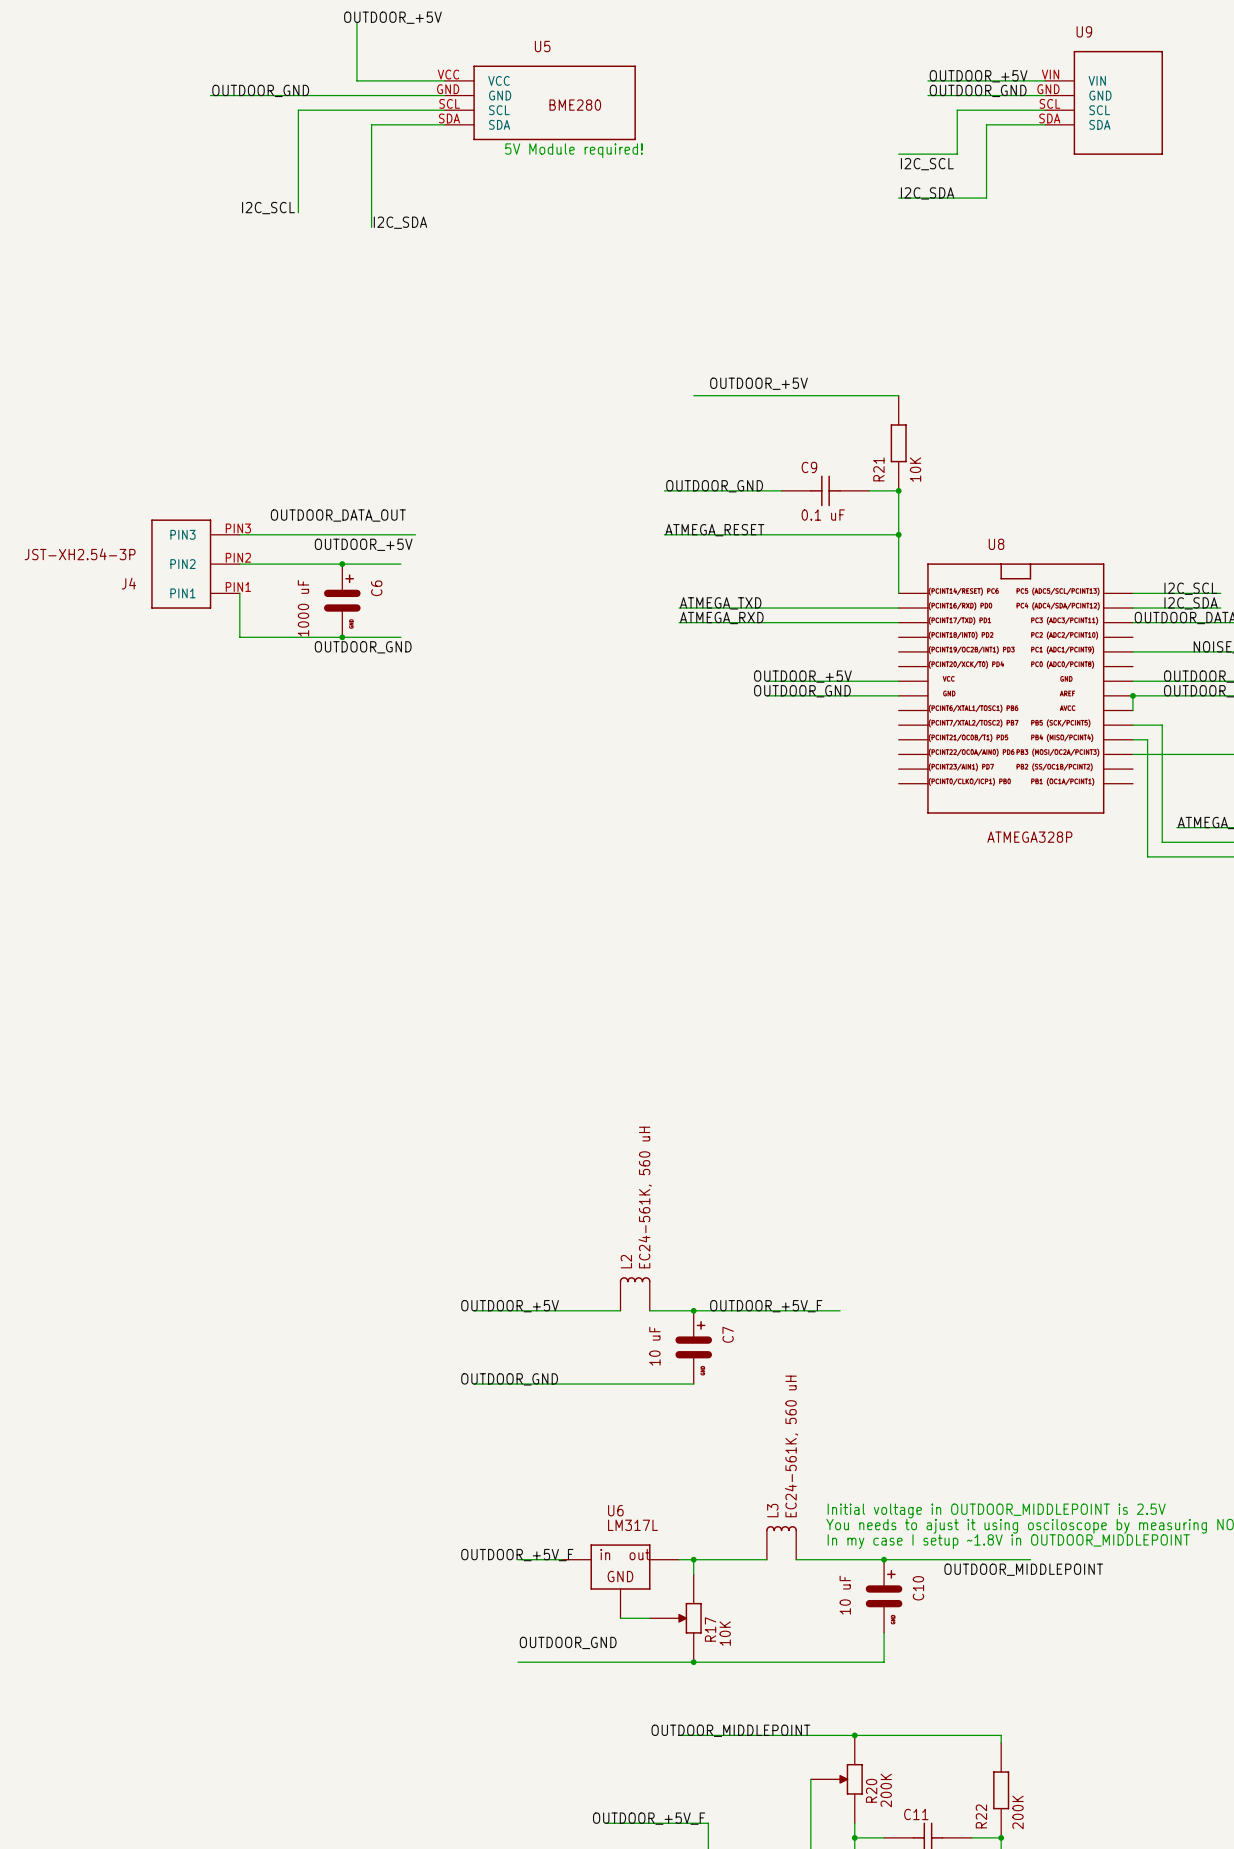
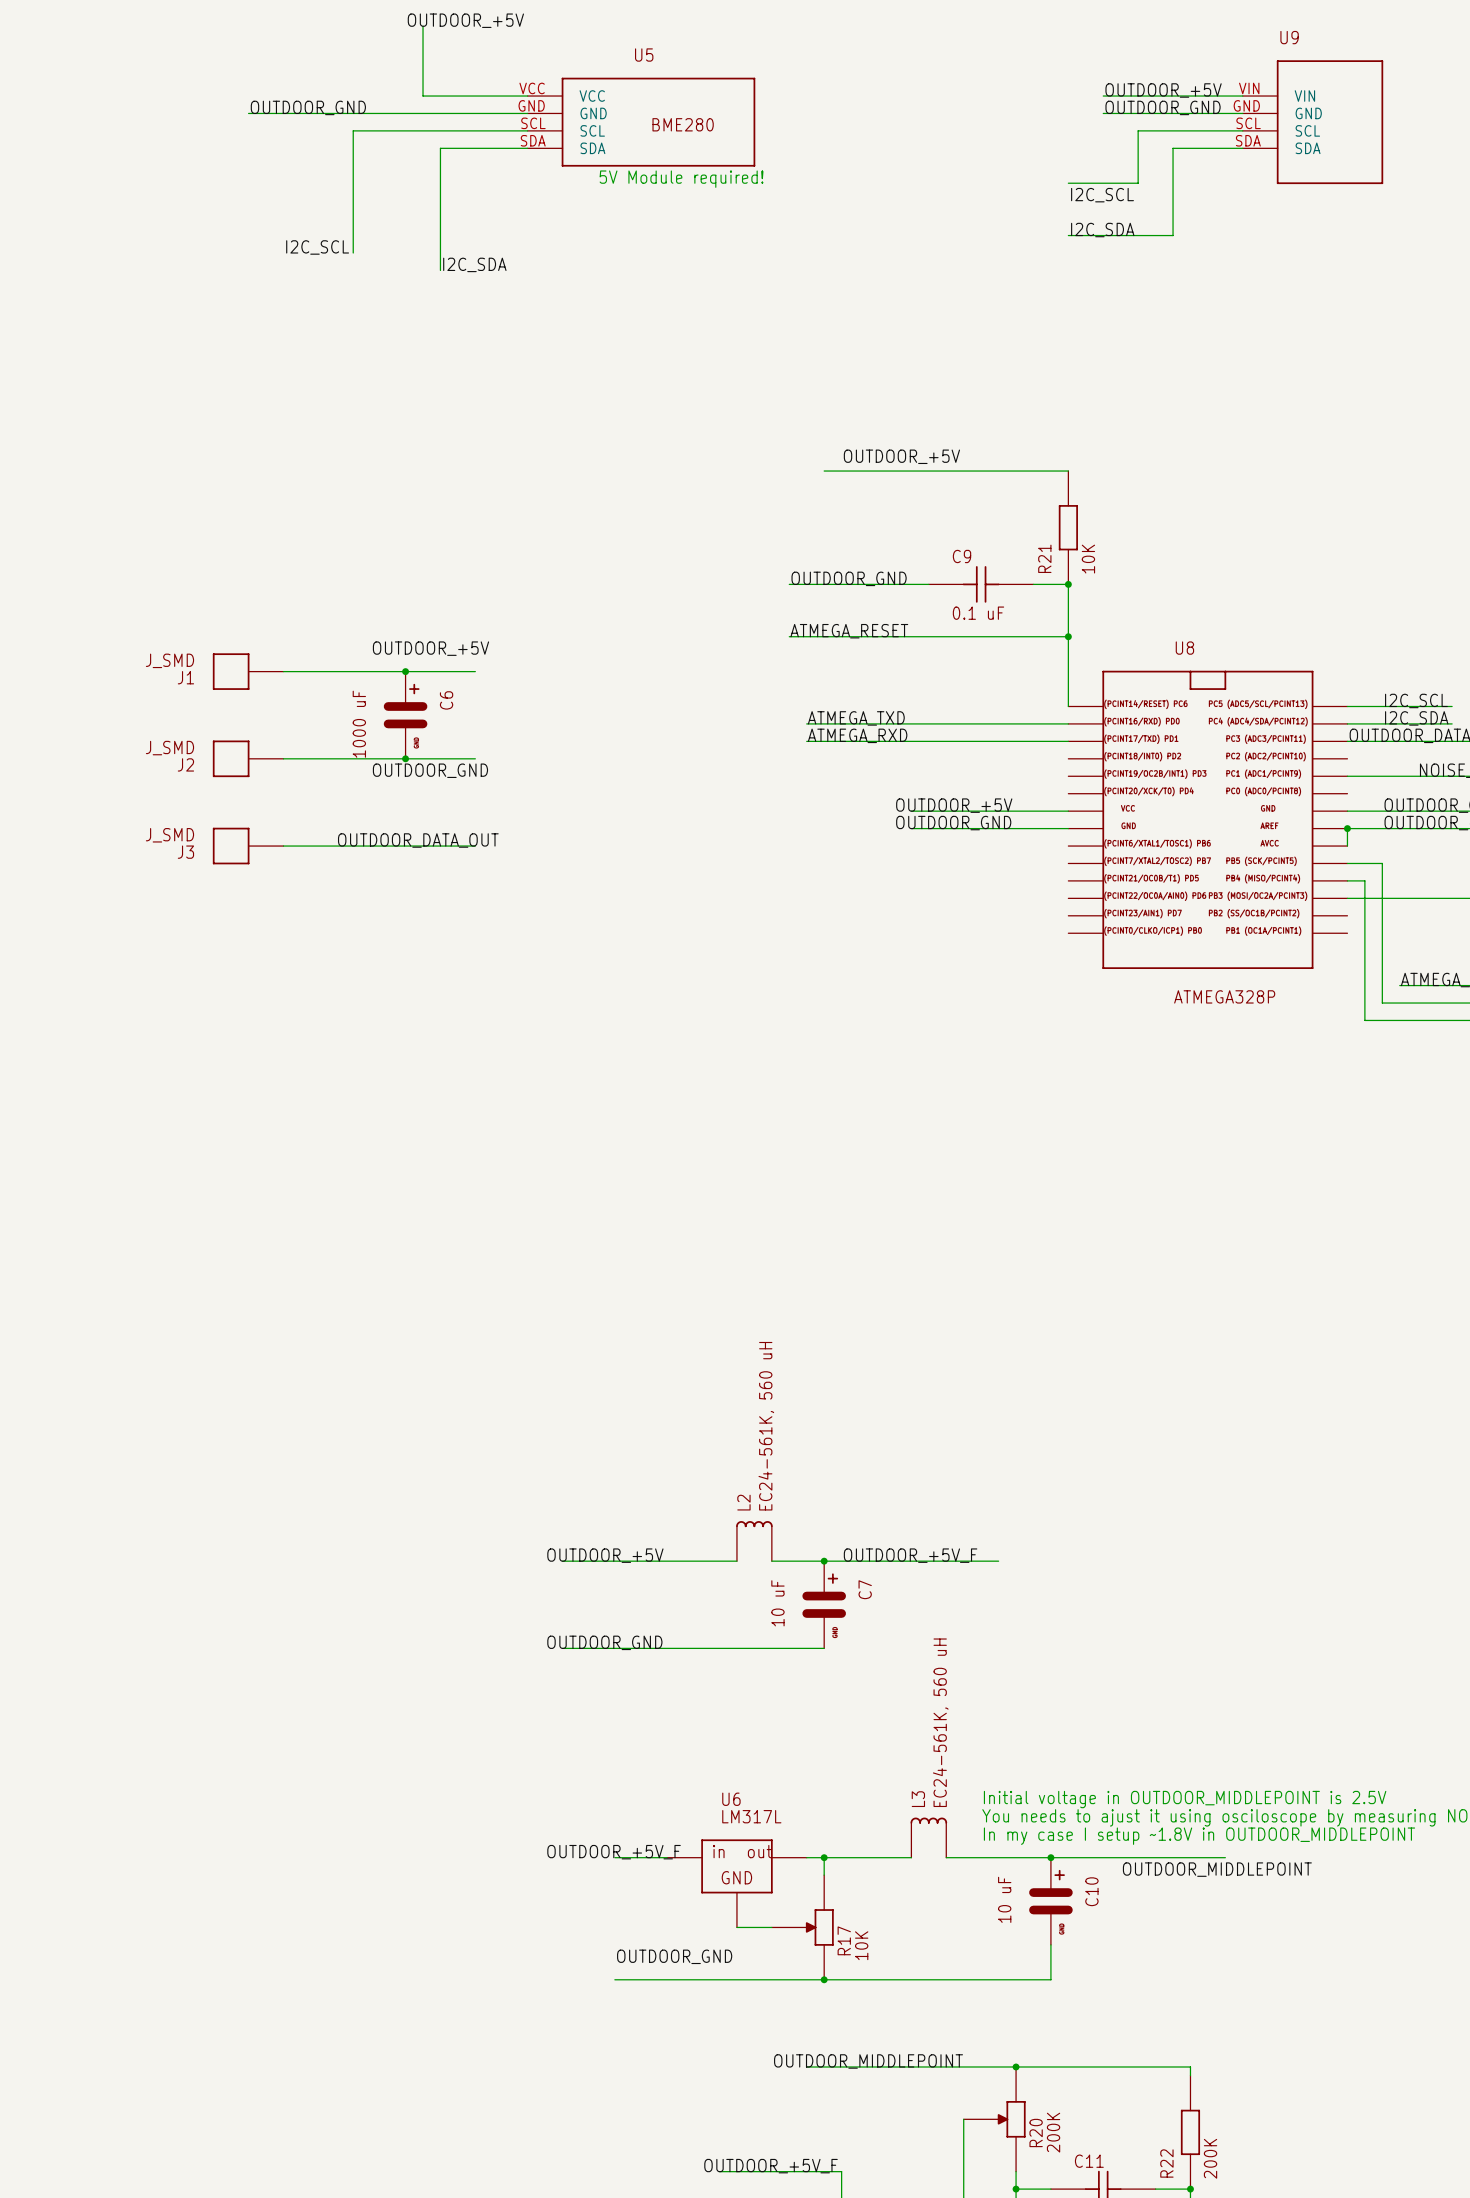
label: OUTDOOR_DATA_OUT (338, 515) -> none
wire: (239, 534) (415, 534) -> none
J4: JST-XH2.54-3P (195, 564) -> none
J1: none -> J_SMD (248, 671)
wire: (239, 593) (239, 637) -> none
J2: none -> J_SMD (248, 758)
label: none -> OUTDOOR_DATA_OUT (418, 840)
J3: none -> J_SMD (248, 846)
wire: none -> (283, 846) (475, 846)

